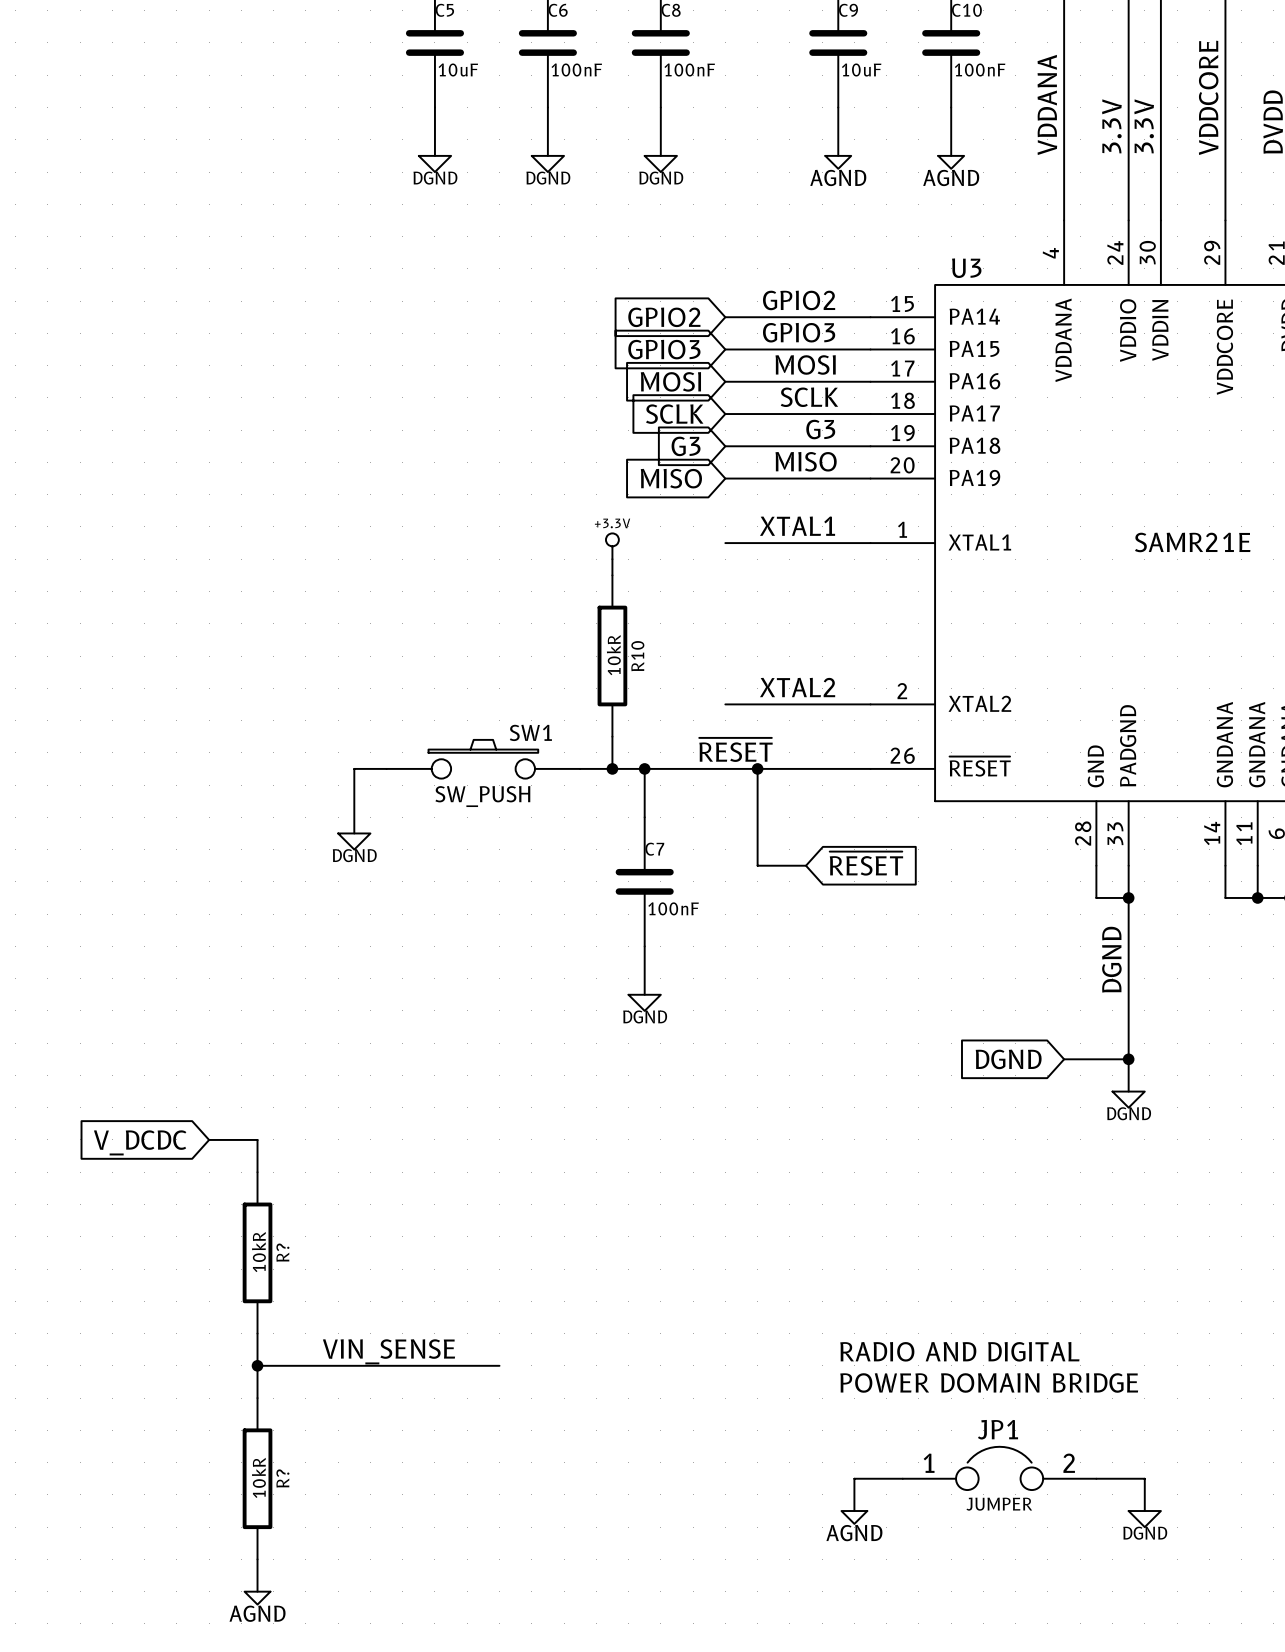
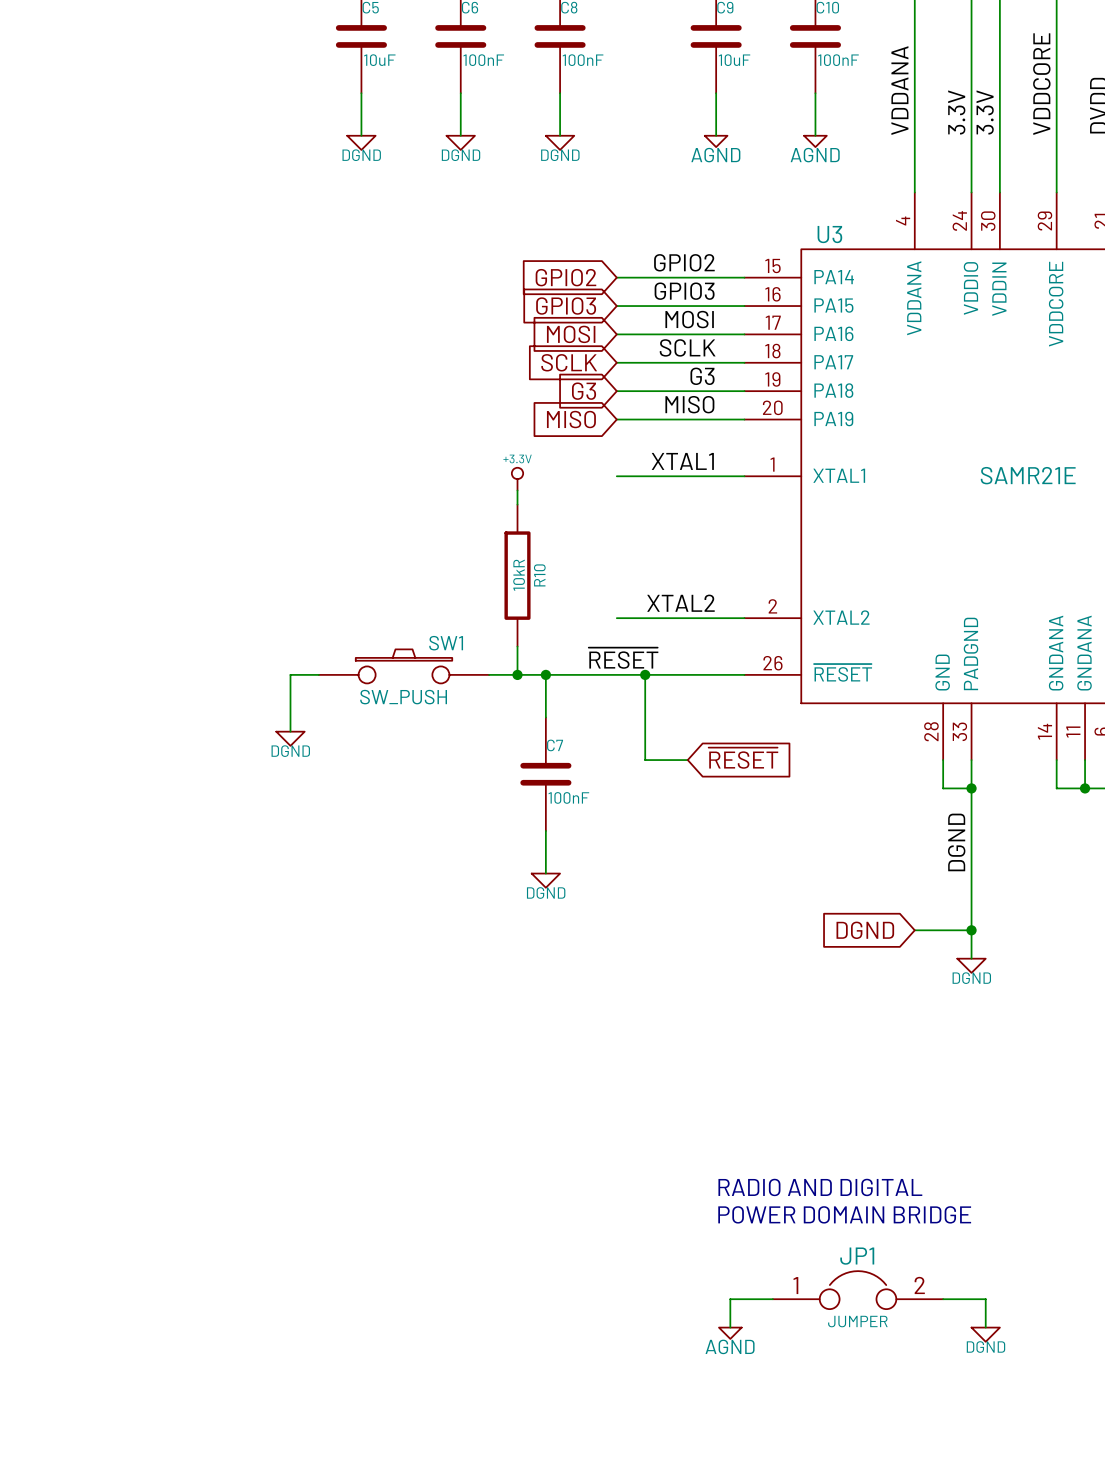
wire: (209, 1139) (257, 1139) (257, 1172) -> none
global label: V_DCDC (140, 1142) -> none
R?: 10kR (257, 1252) -> none
wire: (257, 1333) (257, 1398) -> none
label: VIN_SENSE (388, 1351) -> none
wire: (257, 1365) (499, 1365) -> none
junction: (257, 1365) -> none
R?: 10kR (257, 1478) -> none
wire: (257, 1559) (257, 1591) -> none
power symbol: AGND (257, 1598) -> none

